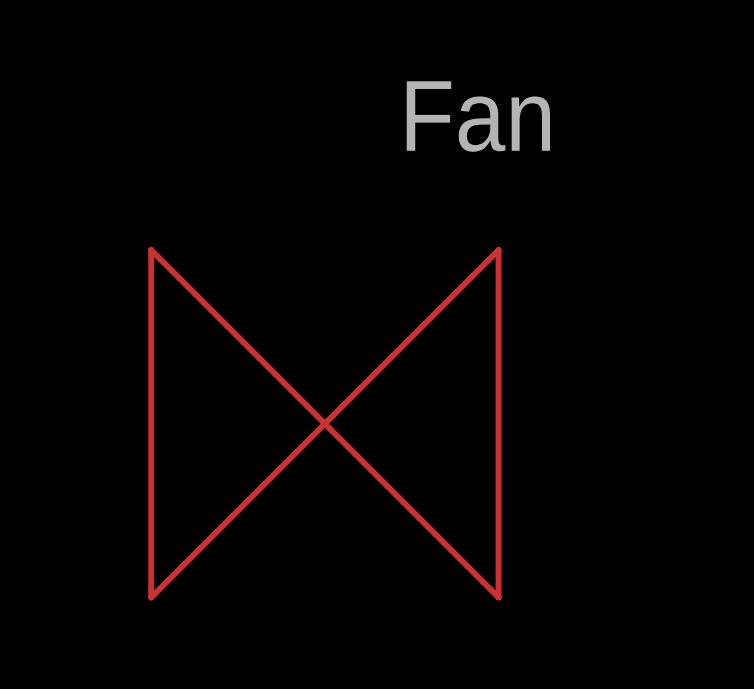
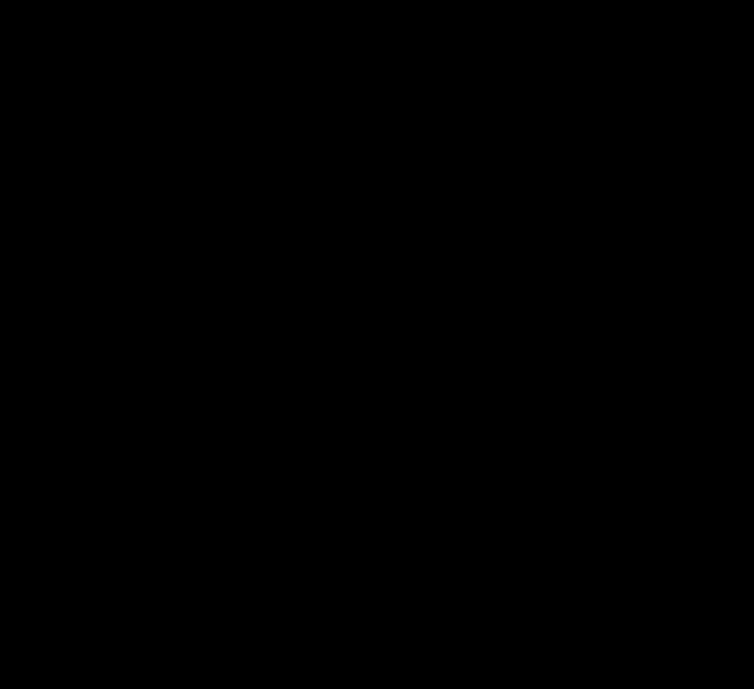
text: Fan (478, 116) -> none
line: (151, 250) (151, 597) (498, 250) (498, 597) (151, 250) -> none

